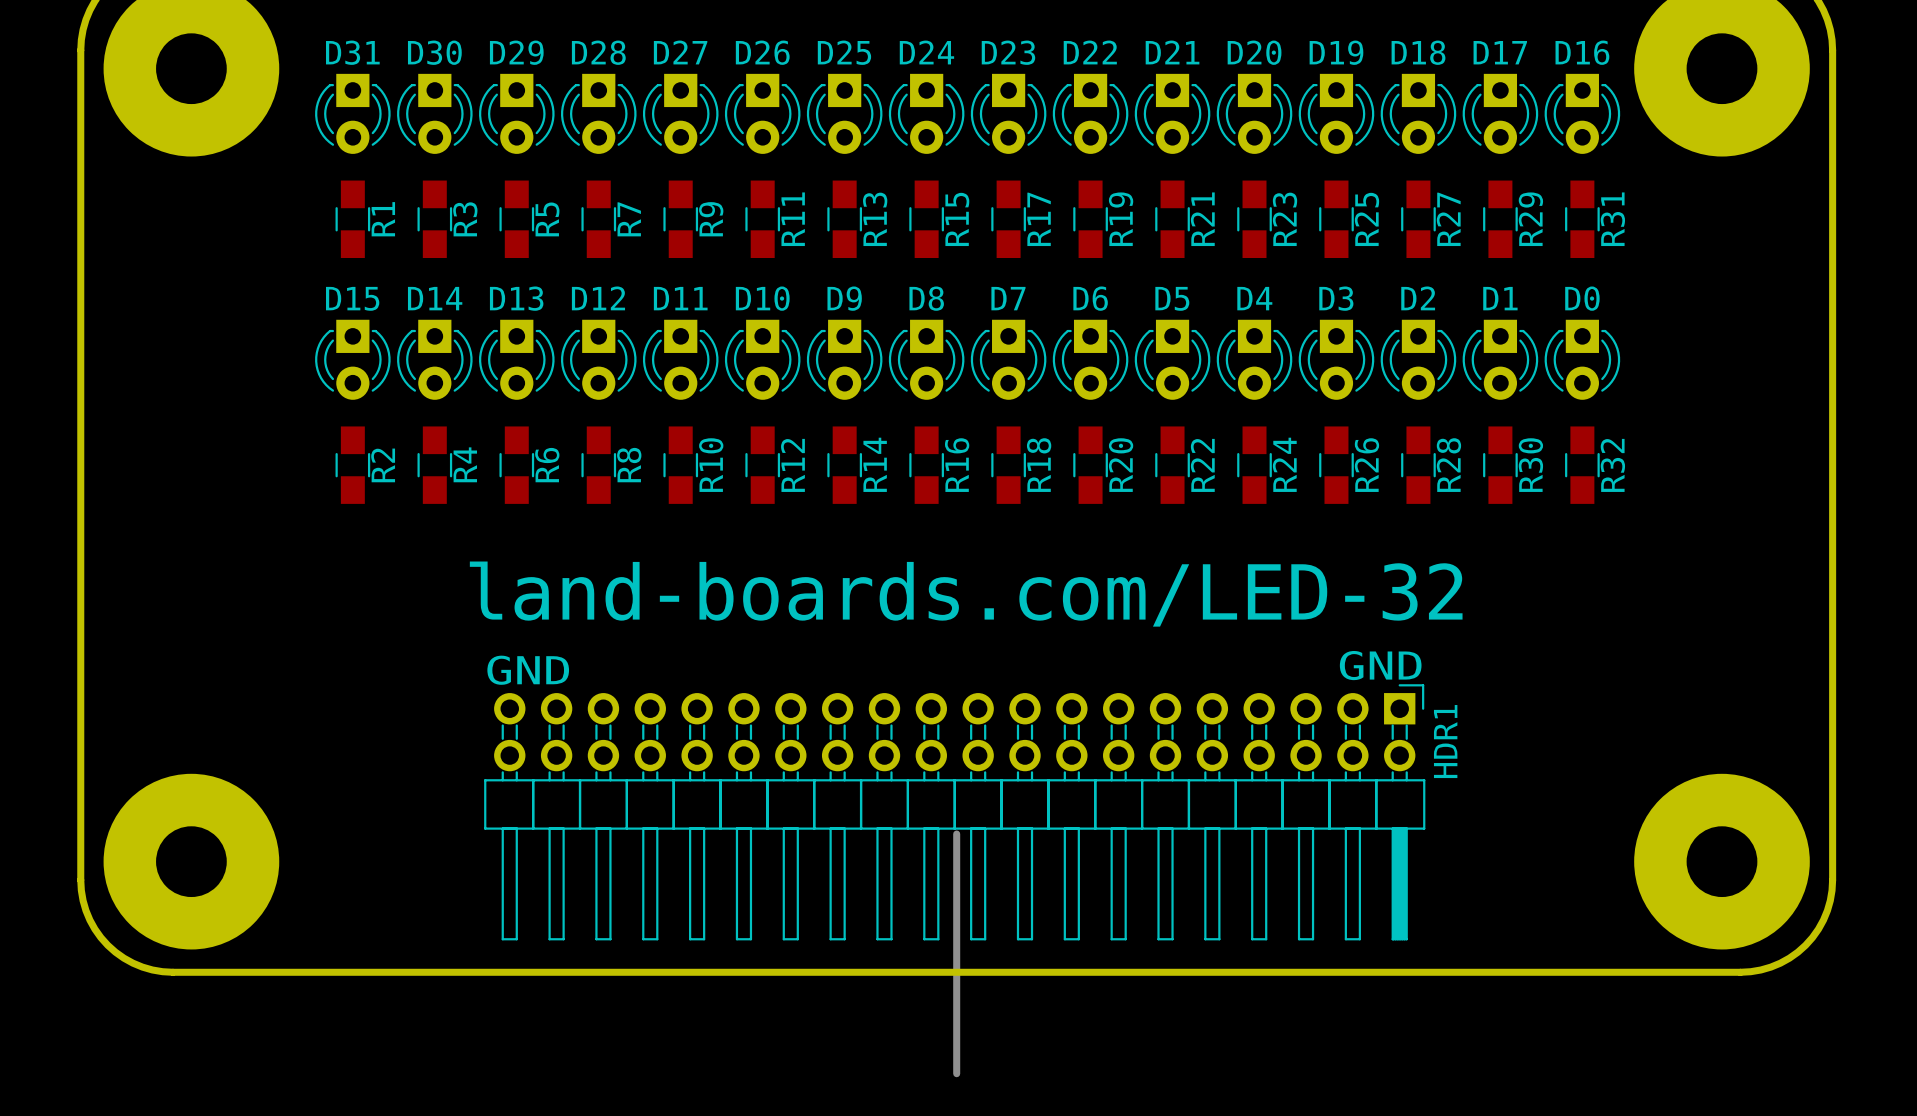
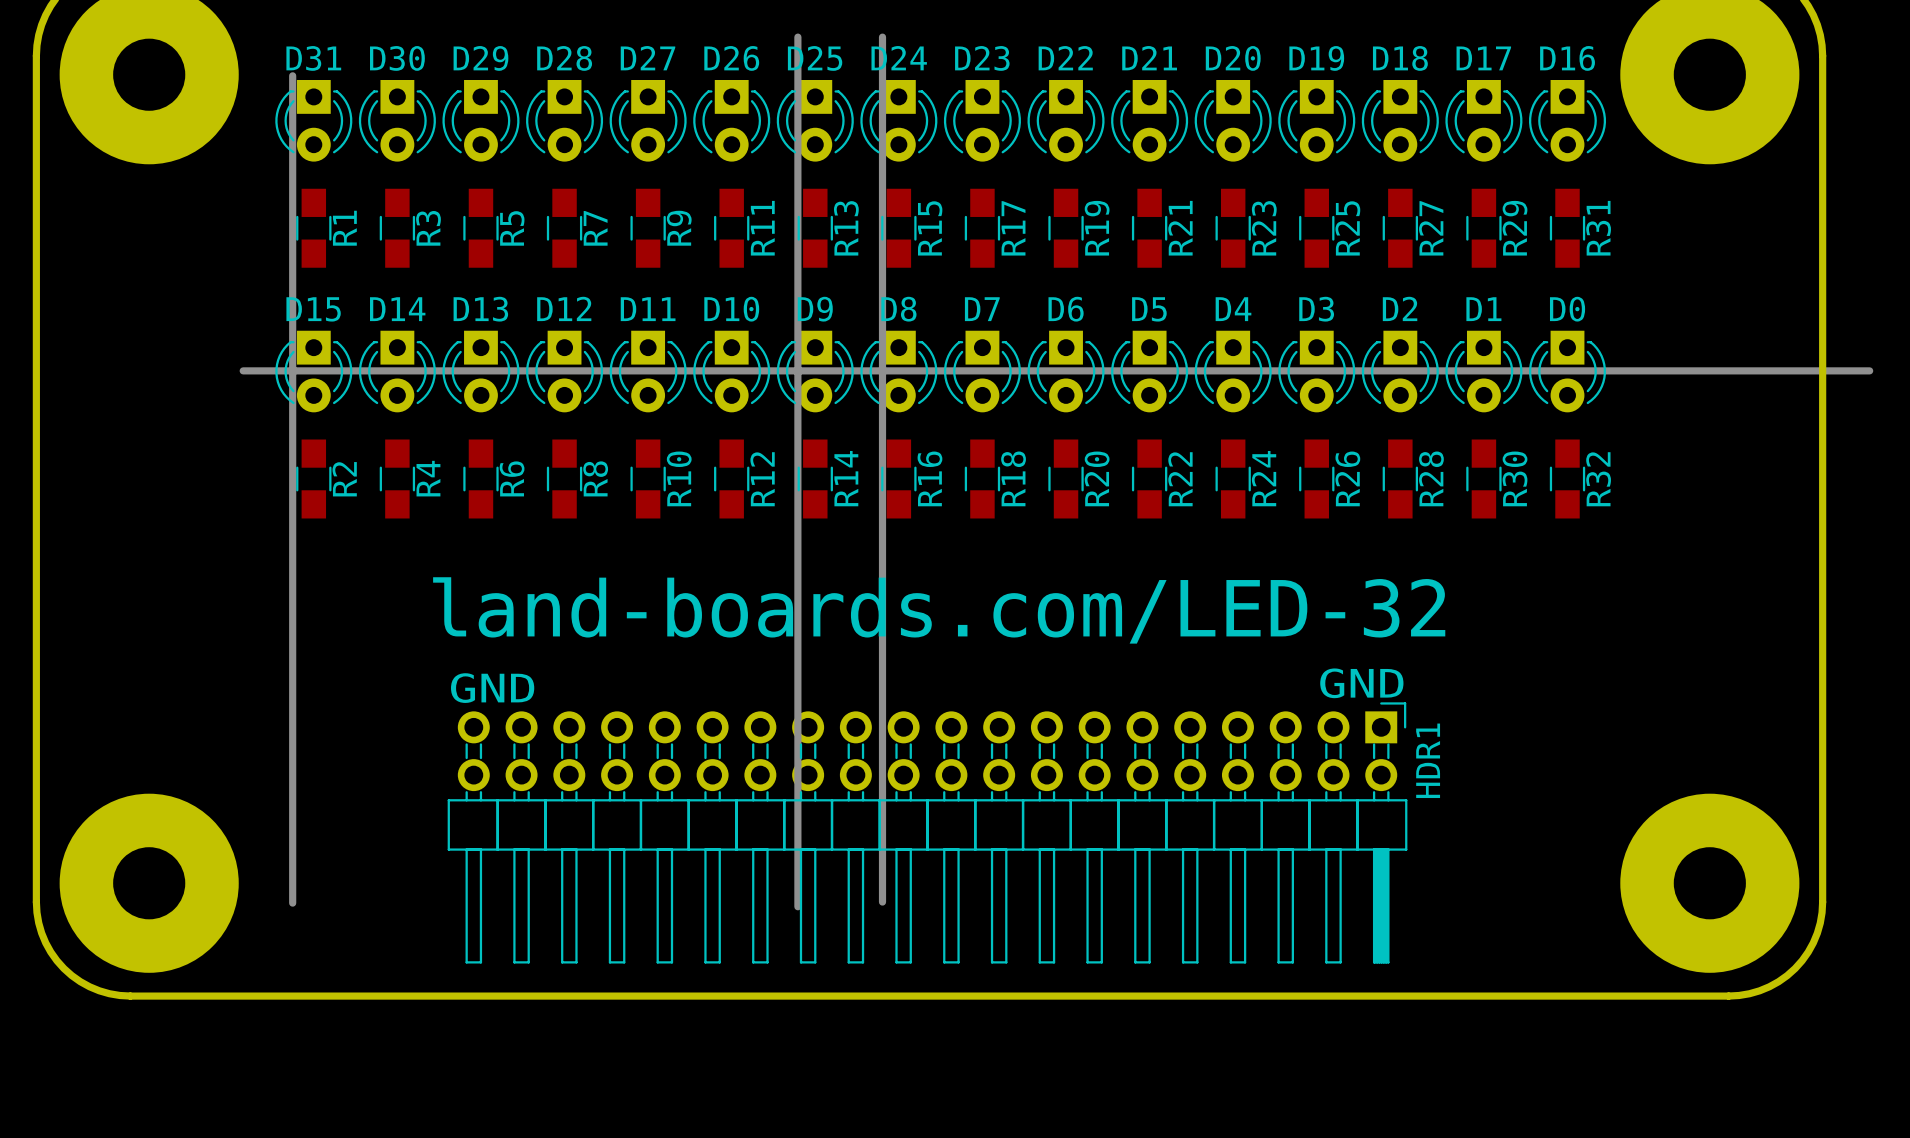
line: none -> (797, 37) (797, 906)
line: none -> (882, 37) (882, 902)
line: none -> (292, 75) (292, 903)
line: none -> (243, 370) (1869, 370)
line: (956, 833) (956, 1073) -> none

